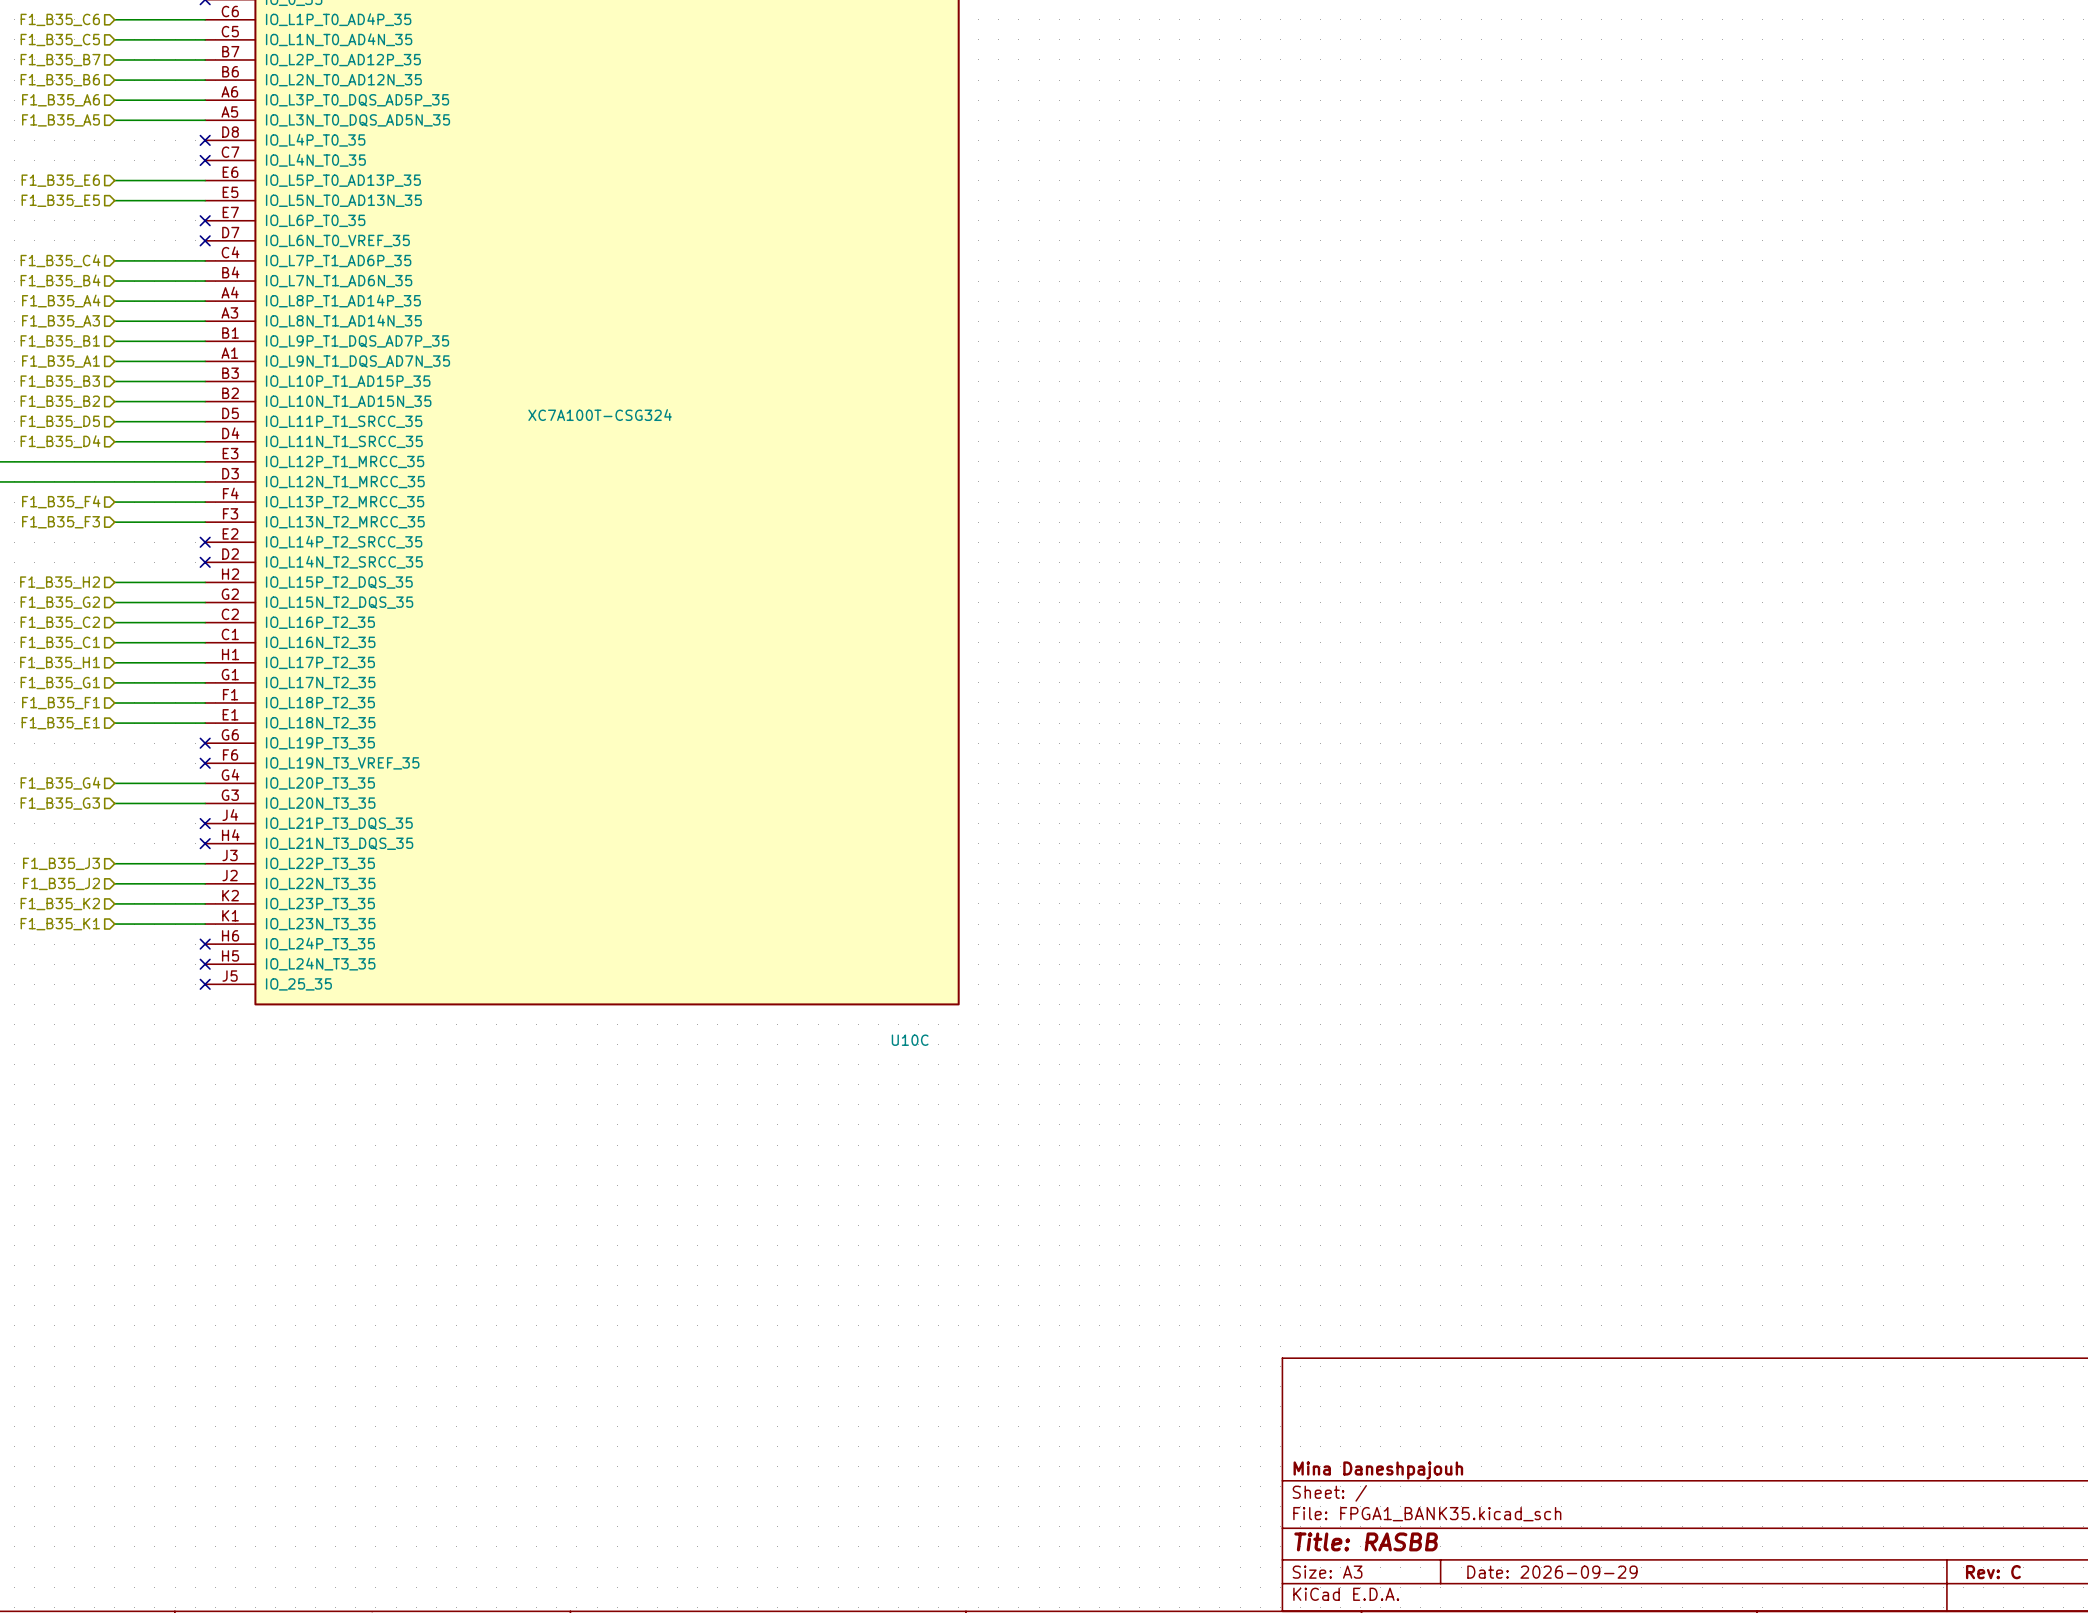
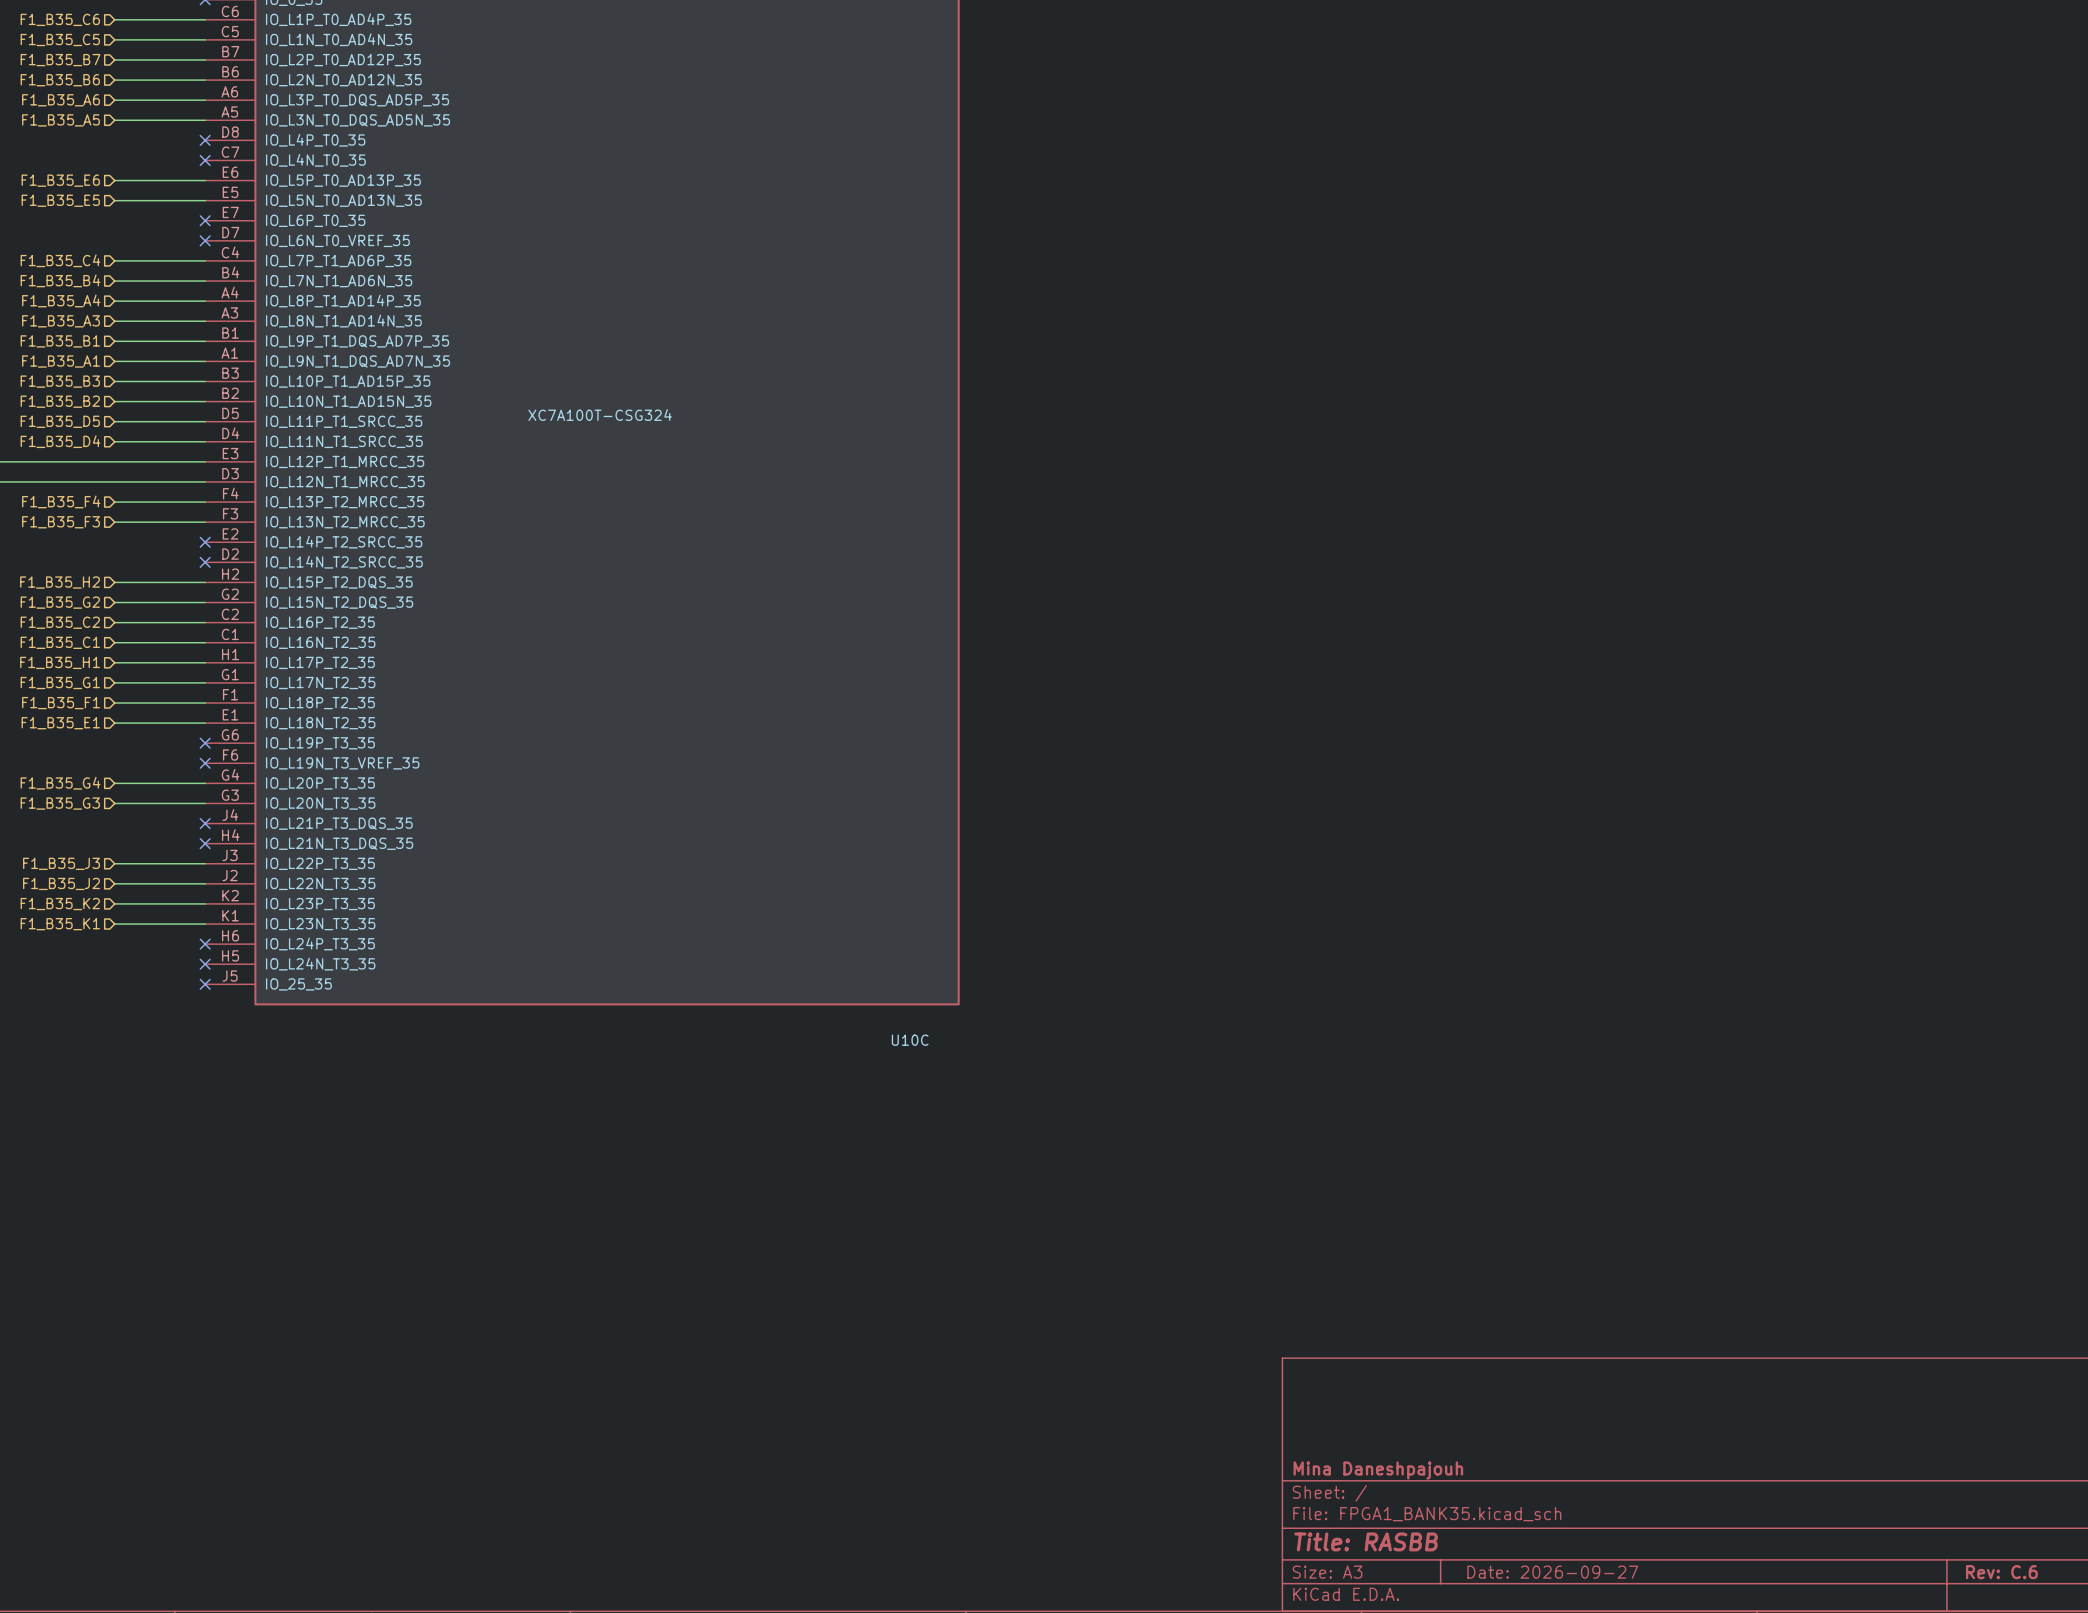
title block: Date: 2026-09-29 (1552, 1572) -> Date: 2026-09-27 (1552, 1572)
title block: Rev: C (1993, 1572) -> Rev: C.6 (2001, 1572)

